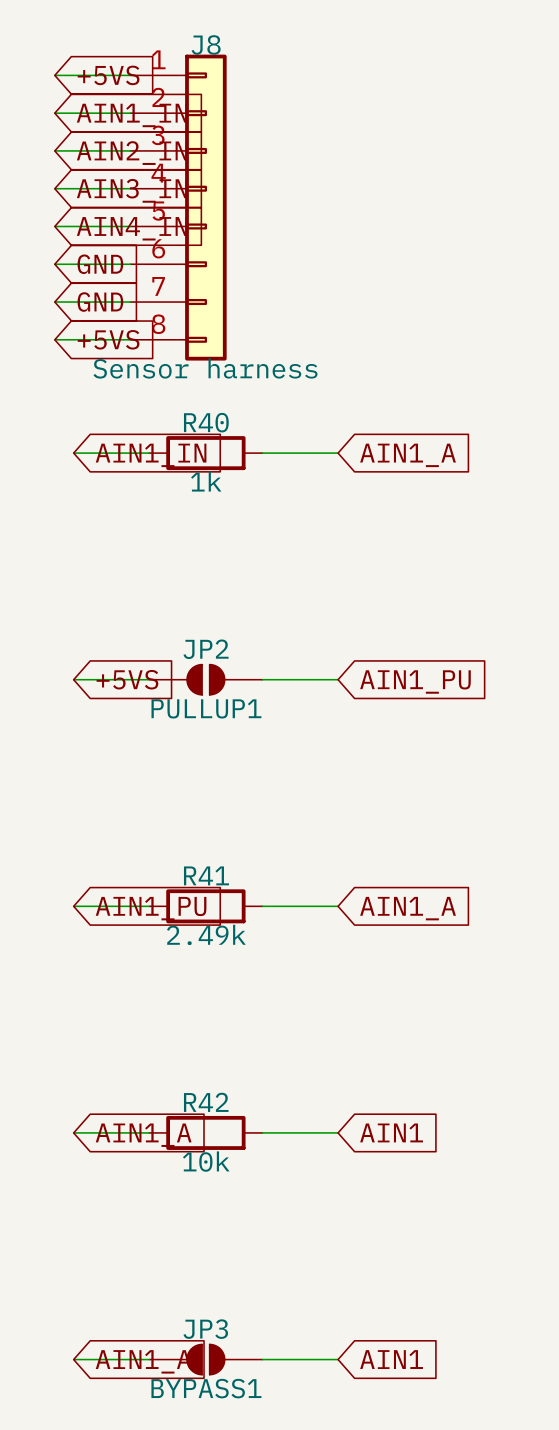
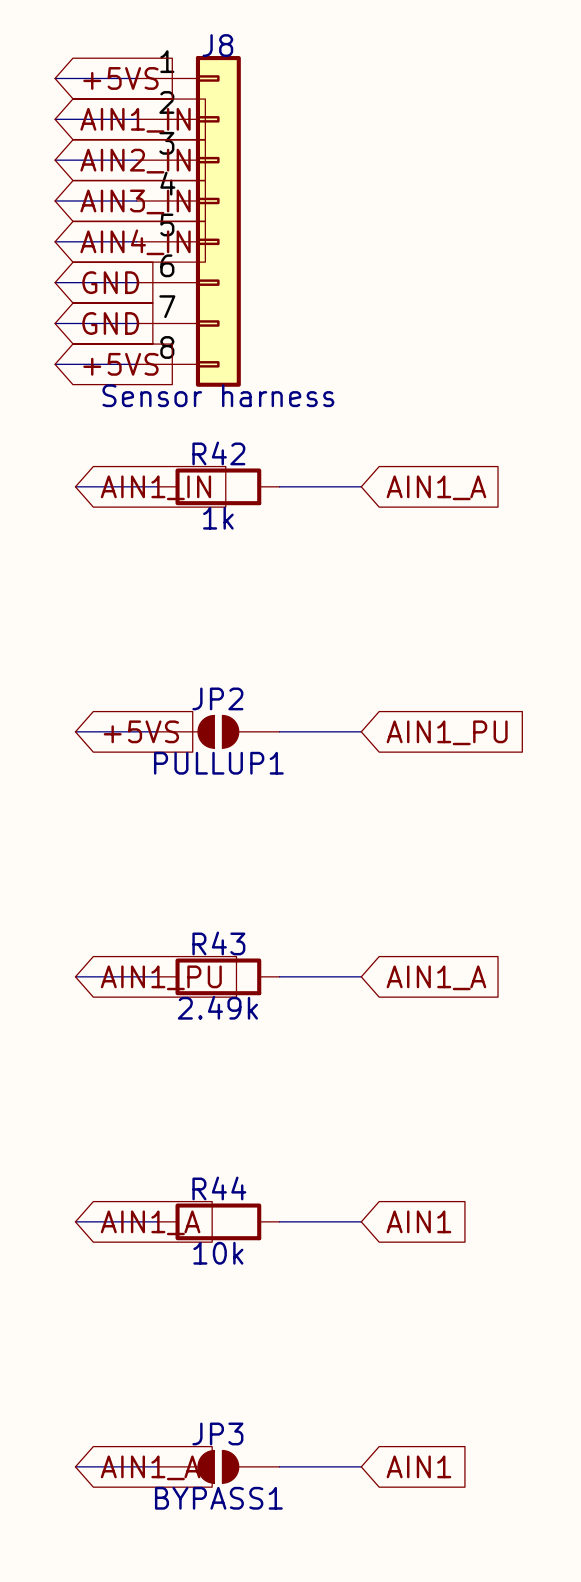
R40 name: R40 (206, 422) -> R42 (218, 453)
R41 name: R41 (206, 875) -> R43 (218, 943)
R42 name: R42 (206, 1102) -> R44 (219, 1188)

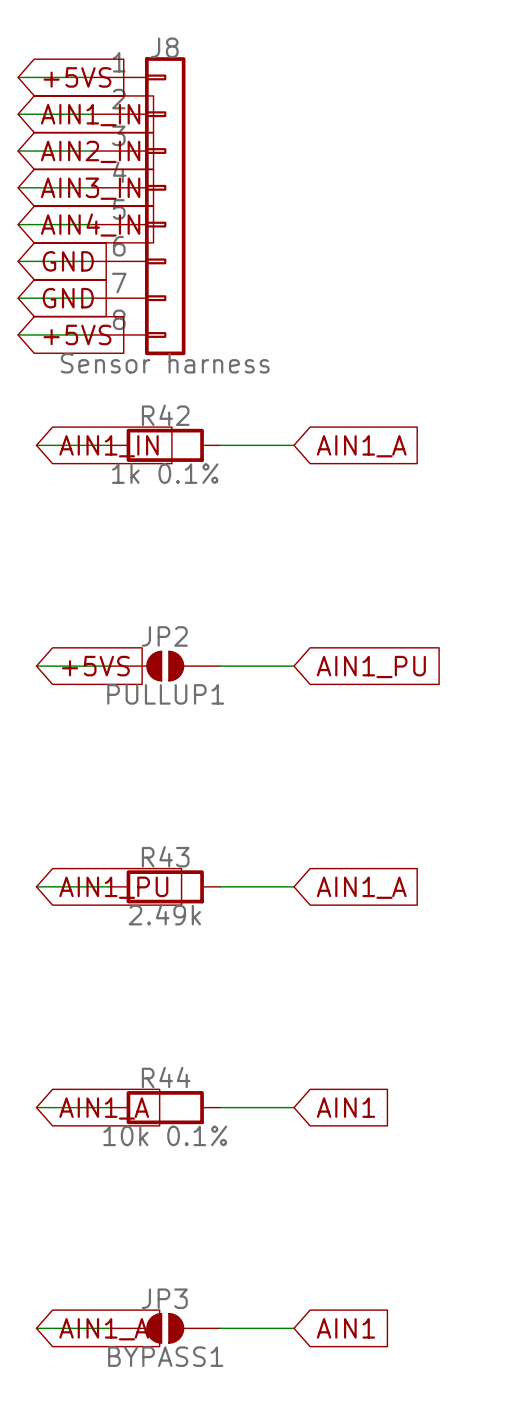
R42 value: 1k (218, 518) -> 1k 0.1% (165, 473)
R44 value: 10k (218, 1253) -> 10k 0.1% (165, 1135)

